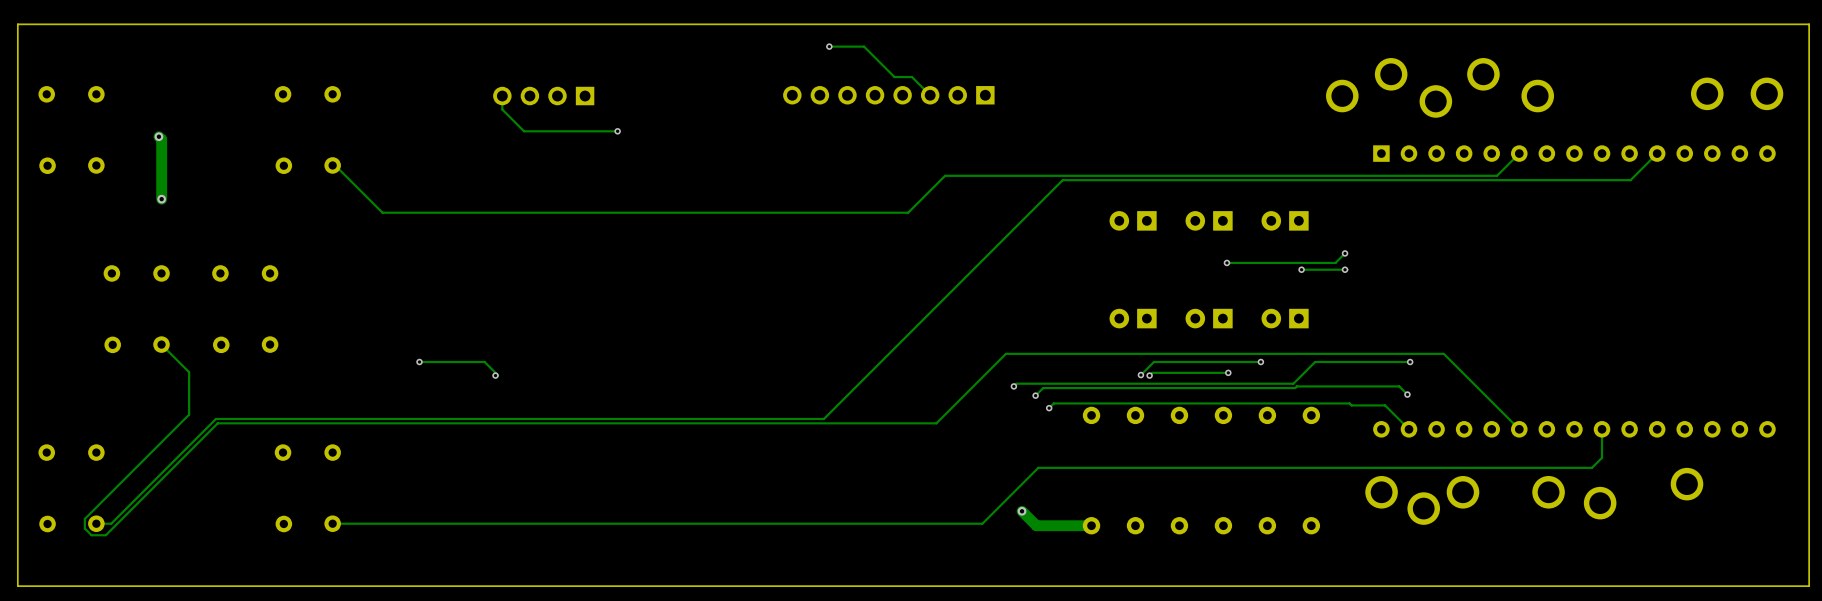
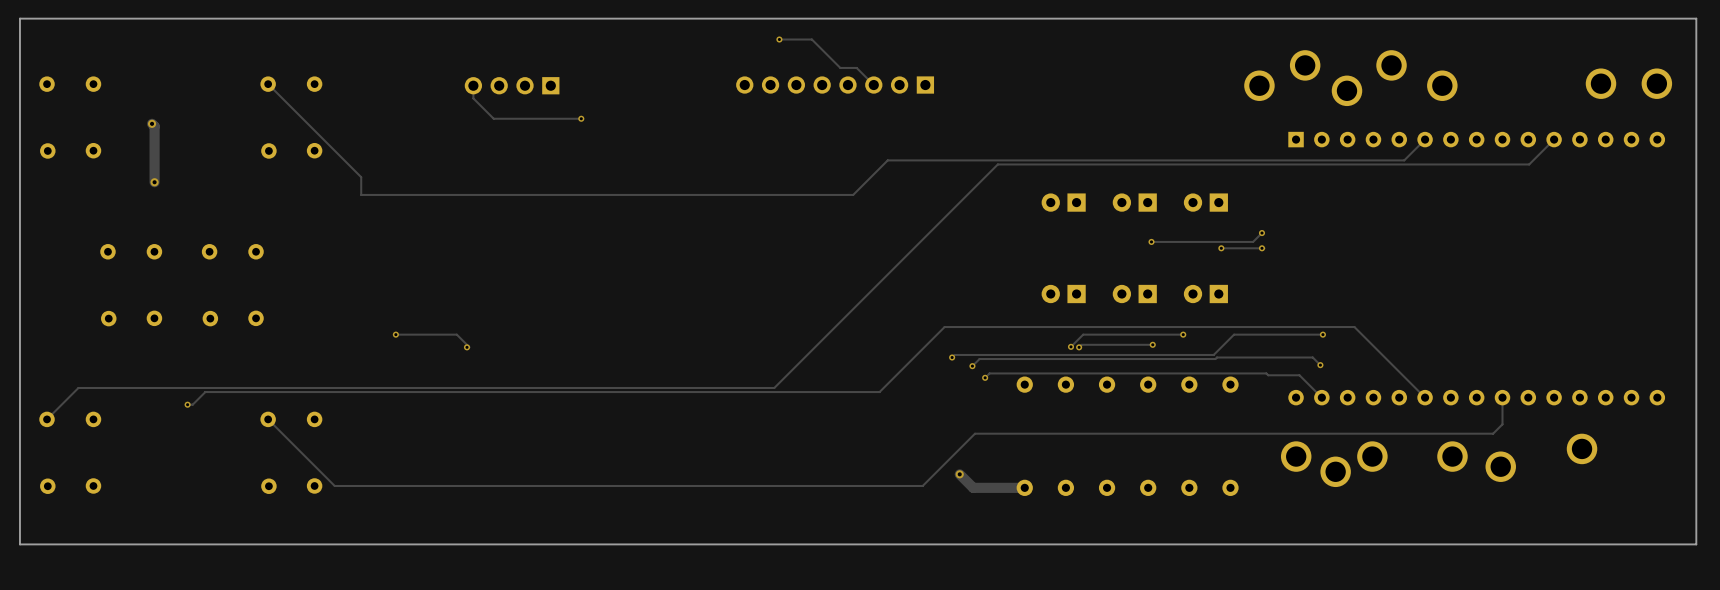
track: (335, 165) (382, 212) -> (268, 84) (361, 177) (361, 194)
track: (161, 344) (189, 372) (189, 414) (84, 518) (84, 528) (91, 535) (105, 535) (217, 423) -> (187, 404) (192, 404) (207, 392)
track: (215, 419) (111, 523) (96, 523) -> (205, 387) (78, 387) (47, 419)
via: none -> (187, 404)
track: (354, 523) (332, 523) -> (334, 485) (268, 419)

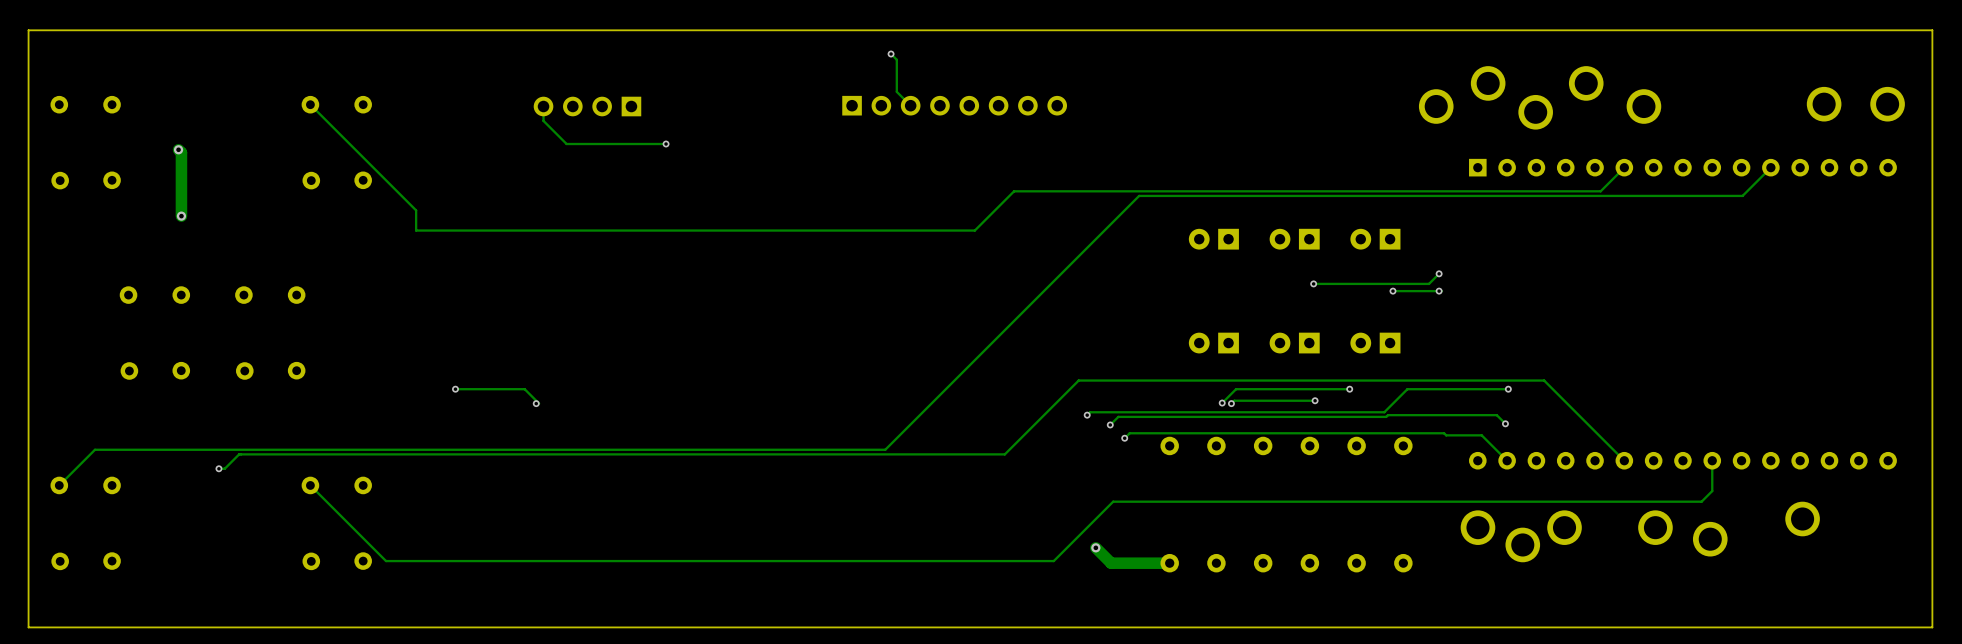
track: (779, 39) (811, 39) (840, 67) (856, 67) (873, 85) -> (891, 54) (896, 59) (896, 91) (910, 105)
part rotation: 0° (835, 85) -> 180° (954, 105)

